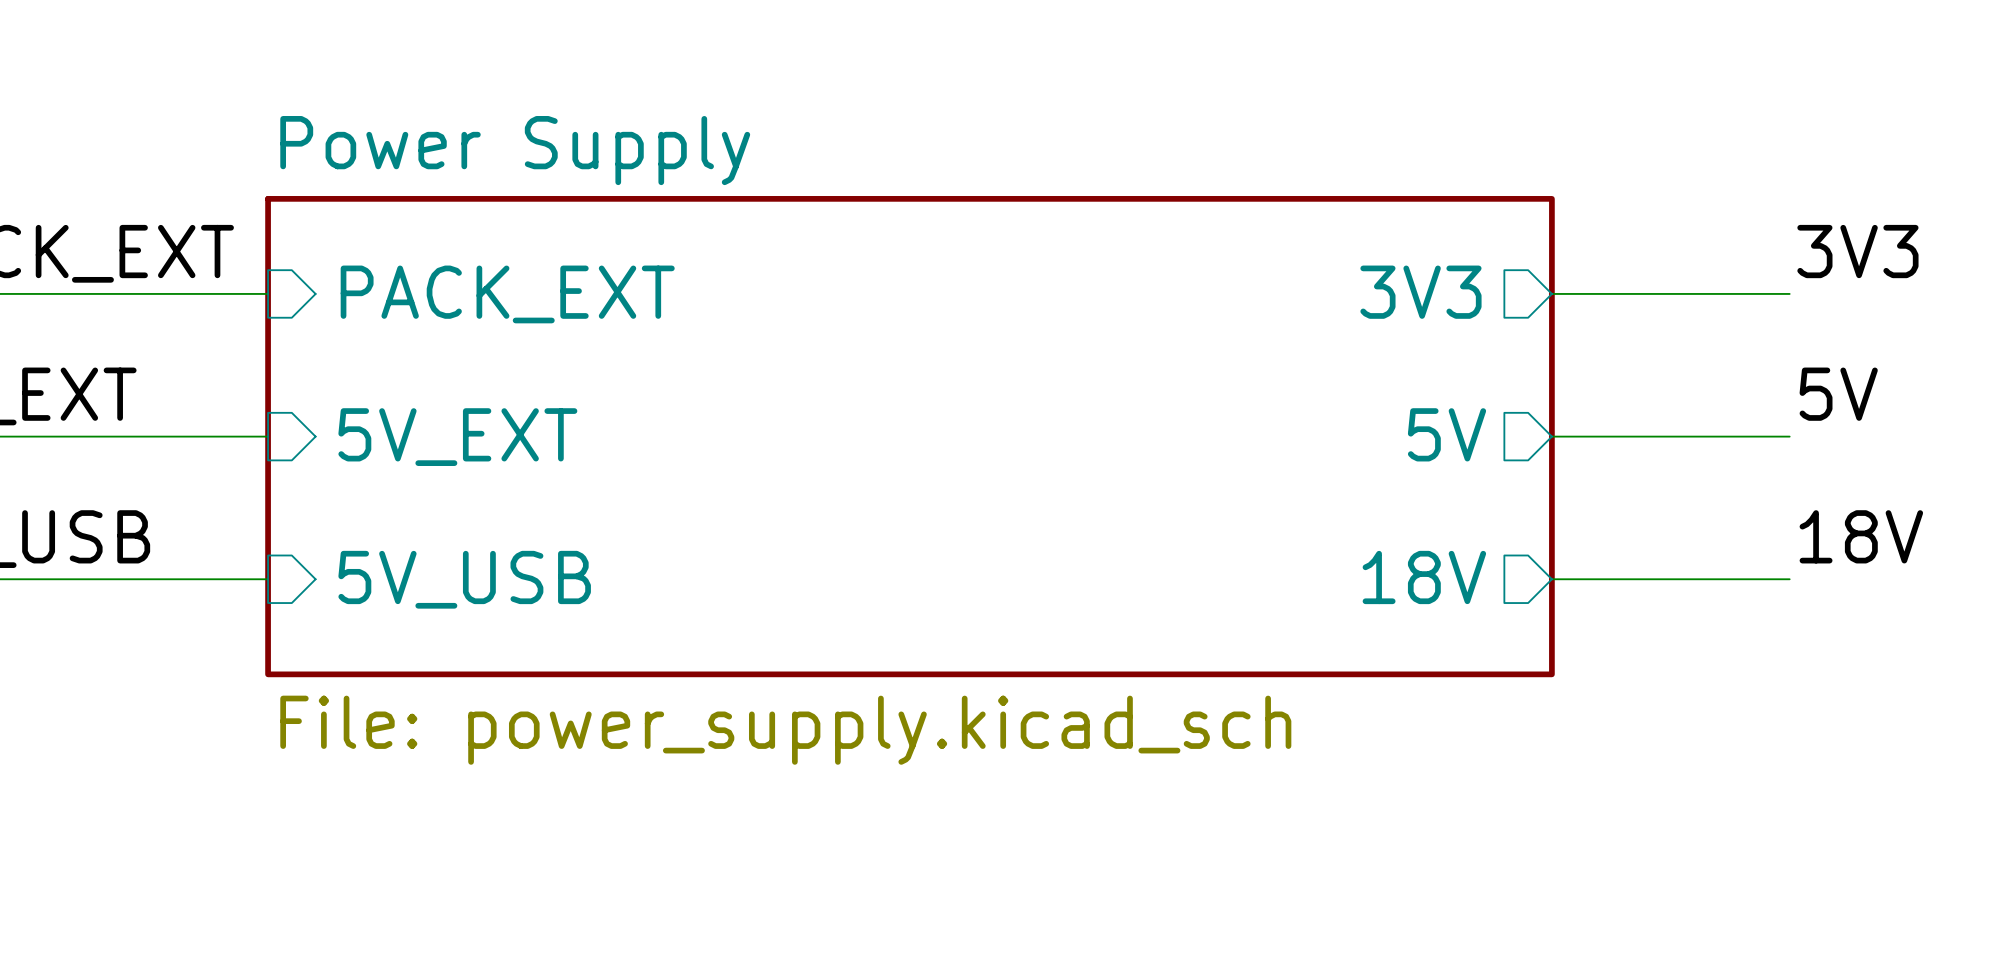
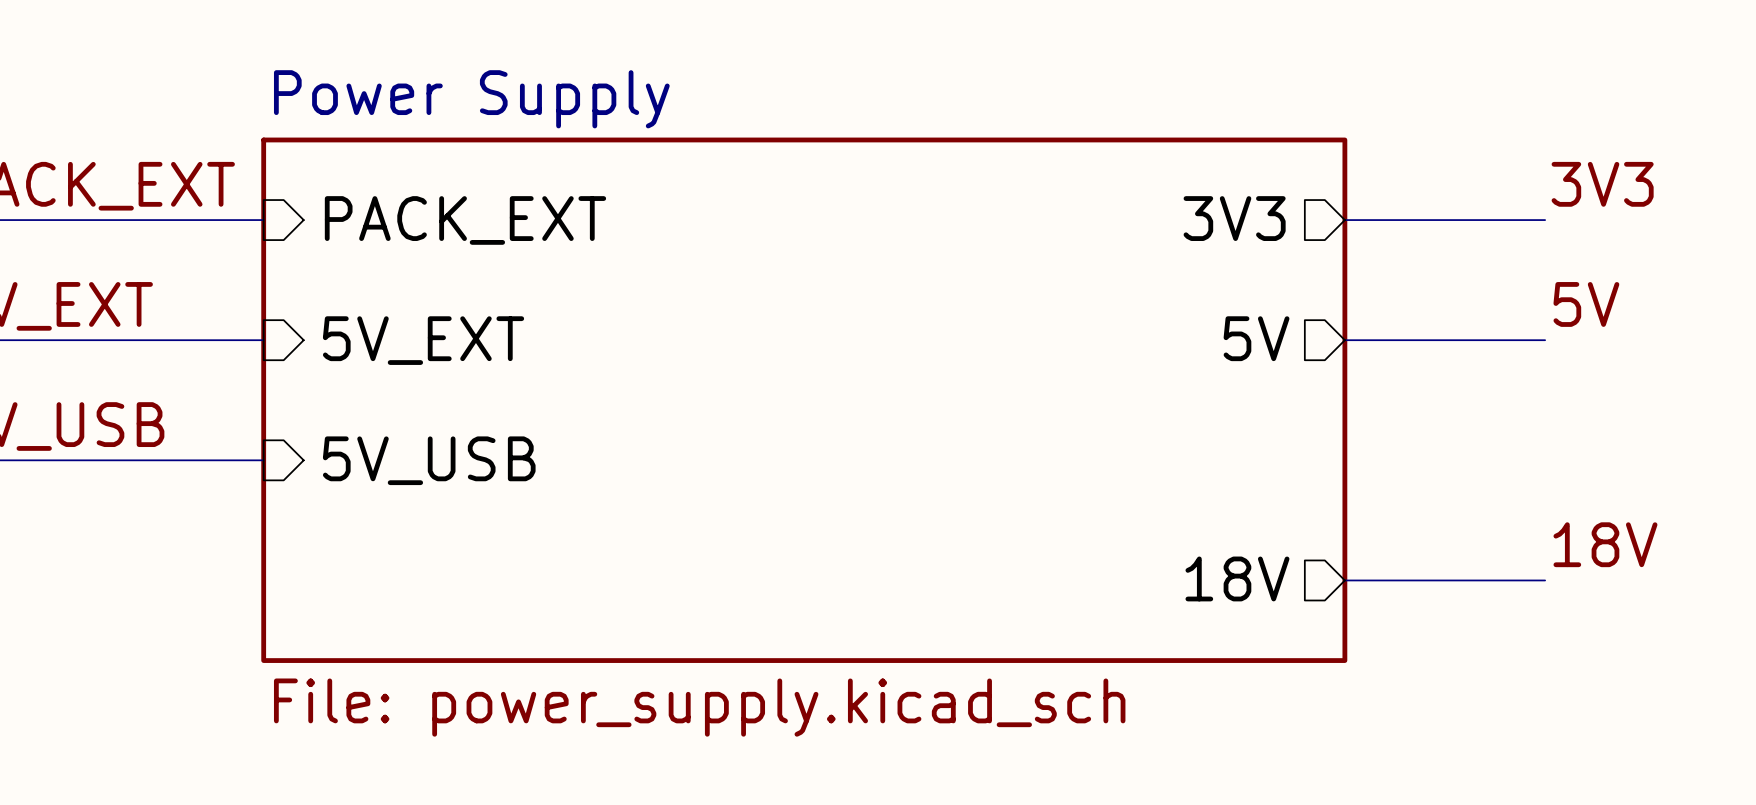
sheet Power Supply: File: power_supply.kicad_sch (909, 436) -> none
sheet Power Supply: none -> File: power_supply.kicad_sch (804, 400)
label position: 18V (1861, 536) -> 18V (1605, 544)
sheet pin position: 18V (1424, 577) -> 18V (1237, 578)
wire: (1551, 579) (1789, 579) -> (1344, 580) (1545, 580)

